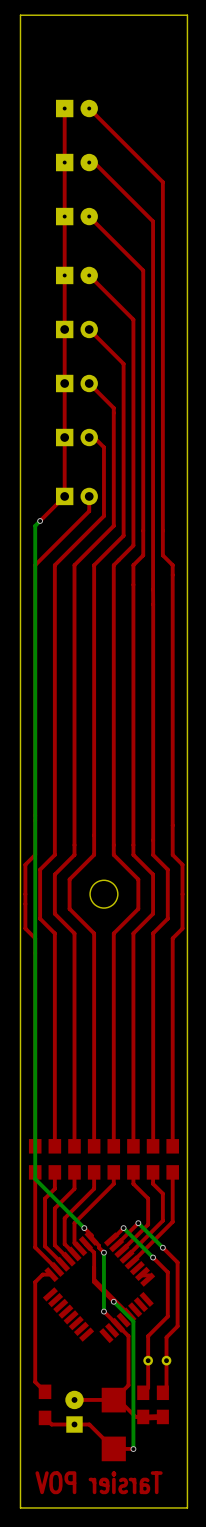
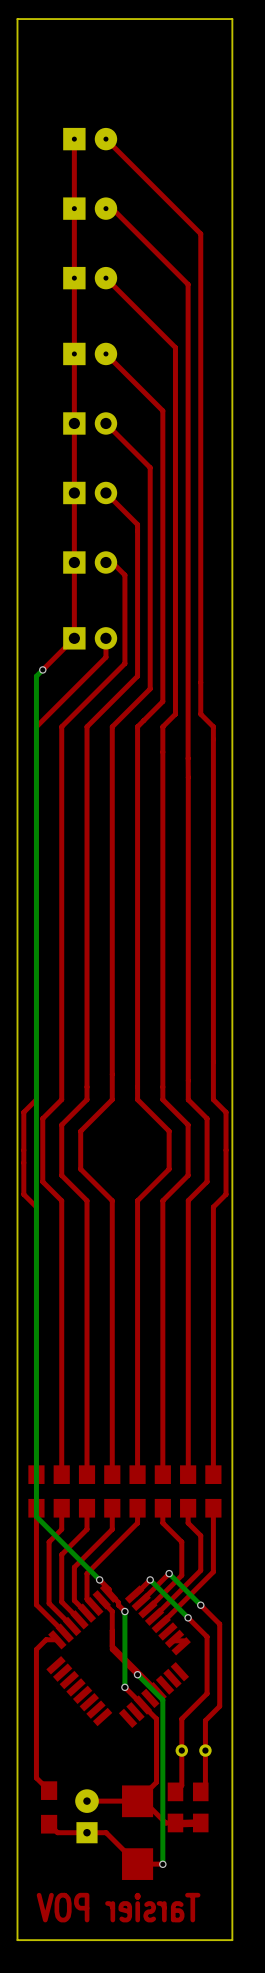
round board edge: [89, 879, 119, 909] -> none

